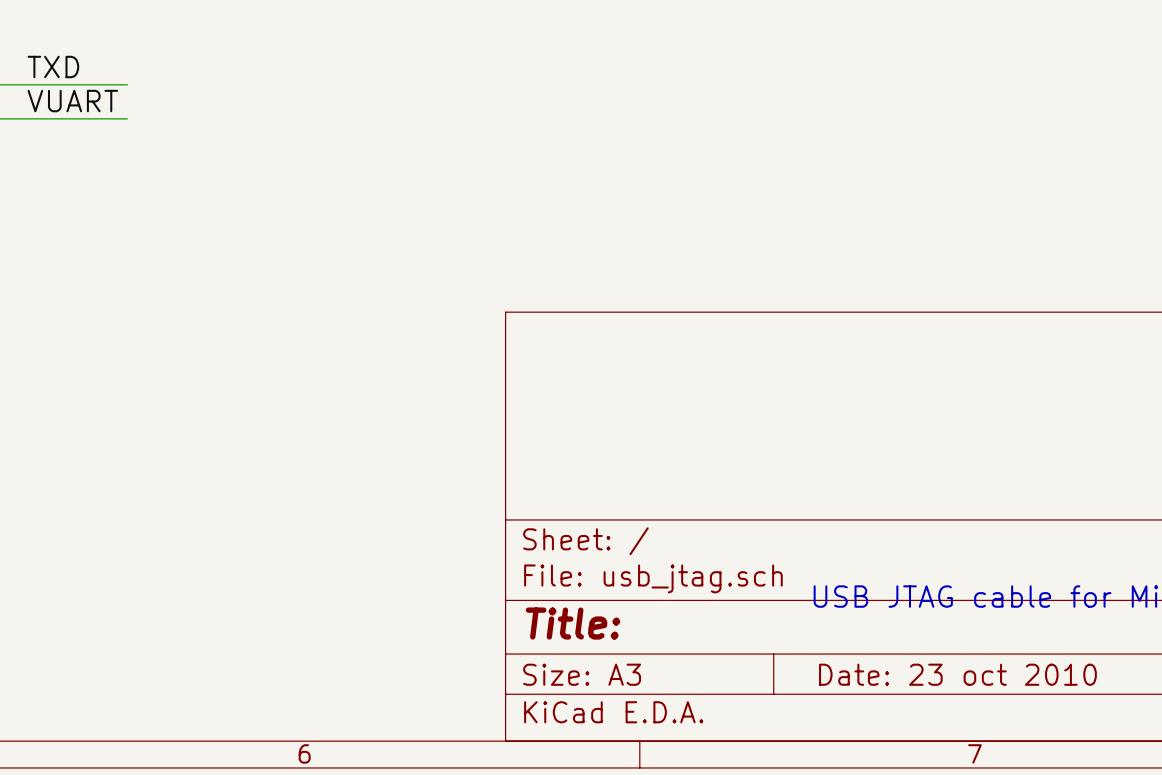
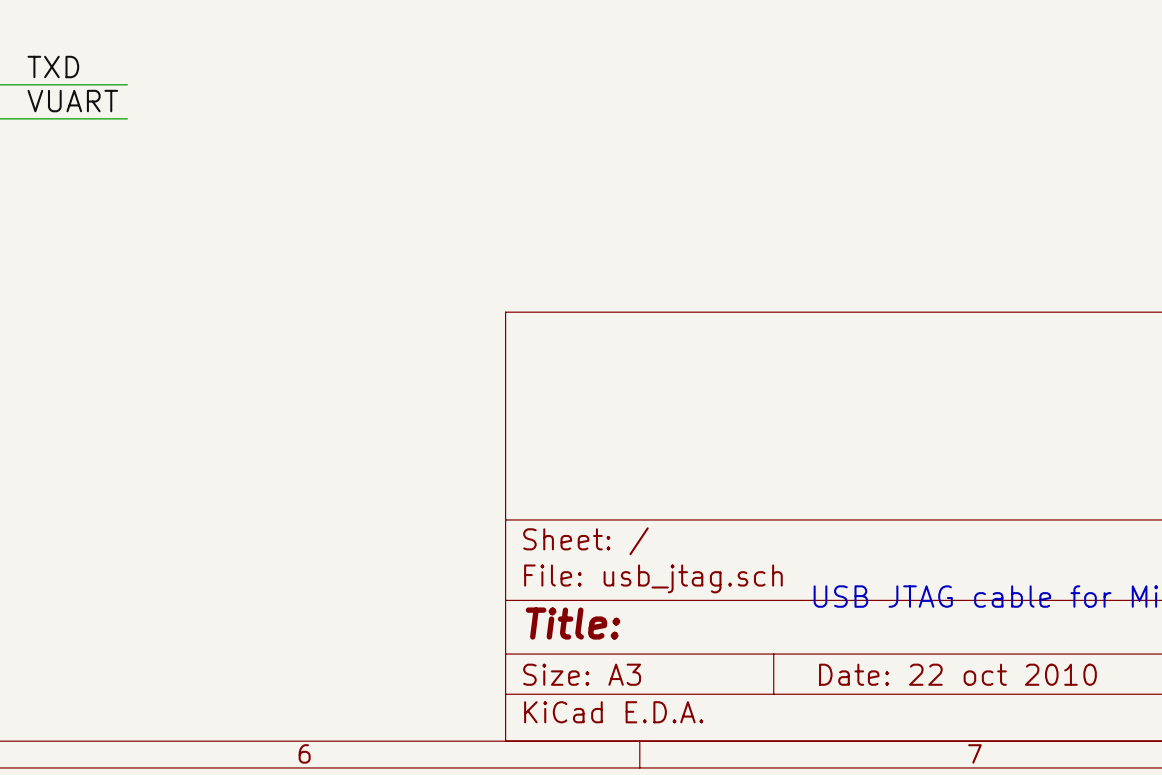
title block: Date: 23 oct 2010 (957, 674) -> Date: 22 oct 2010 (957, 674)

